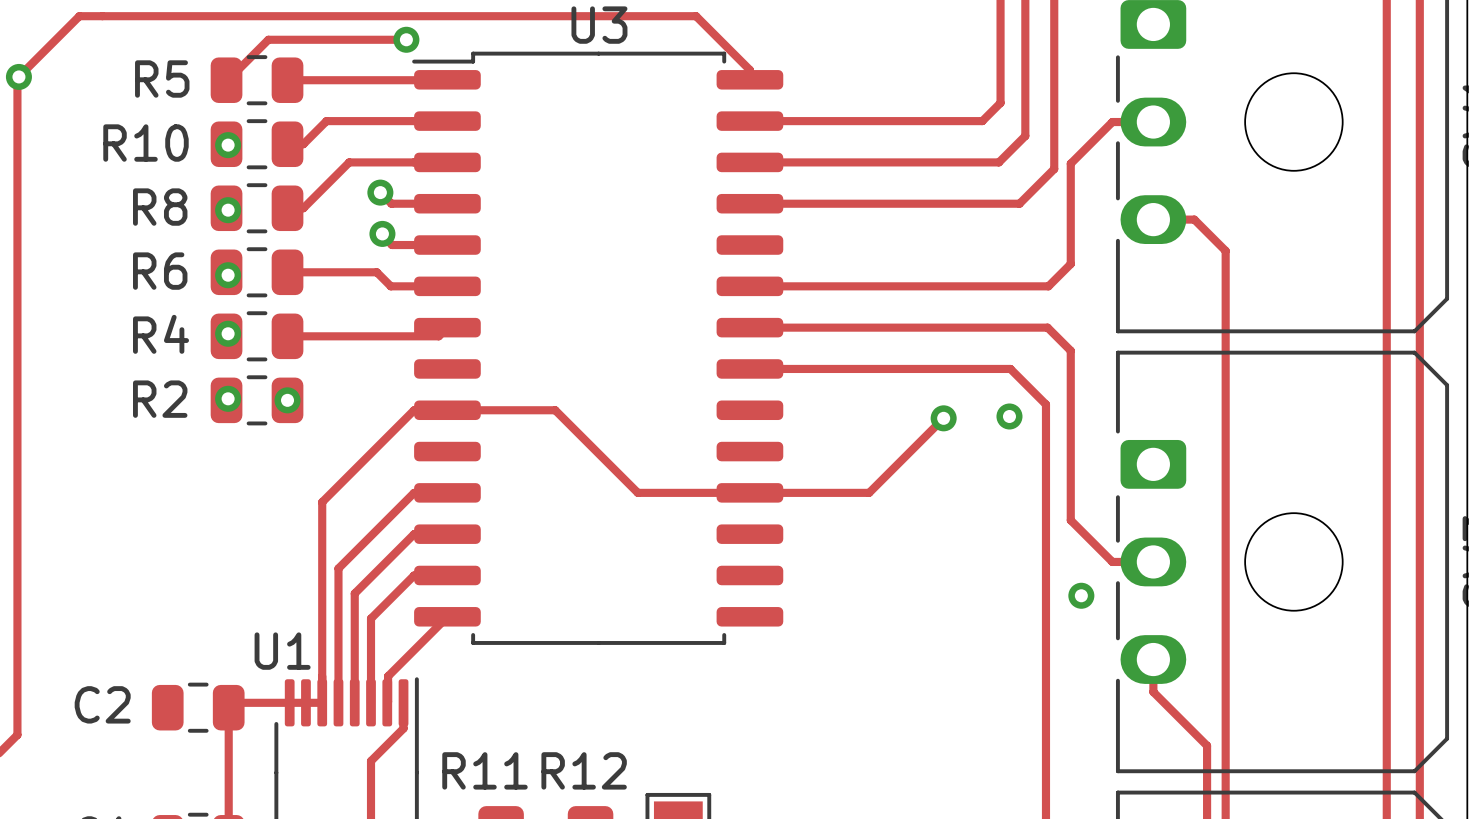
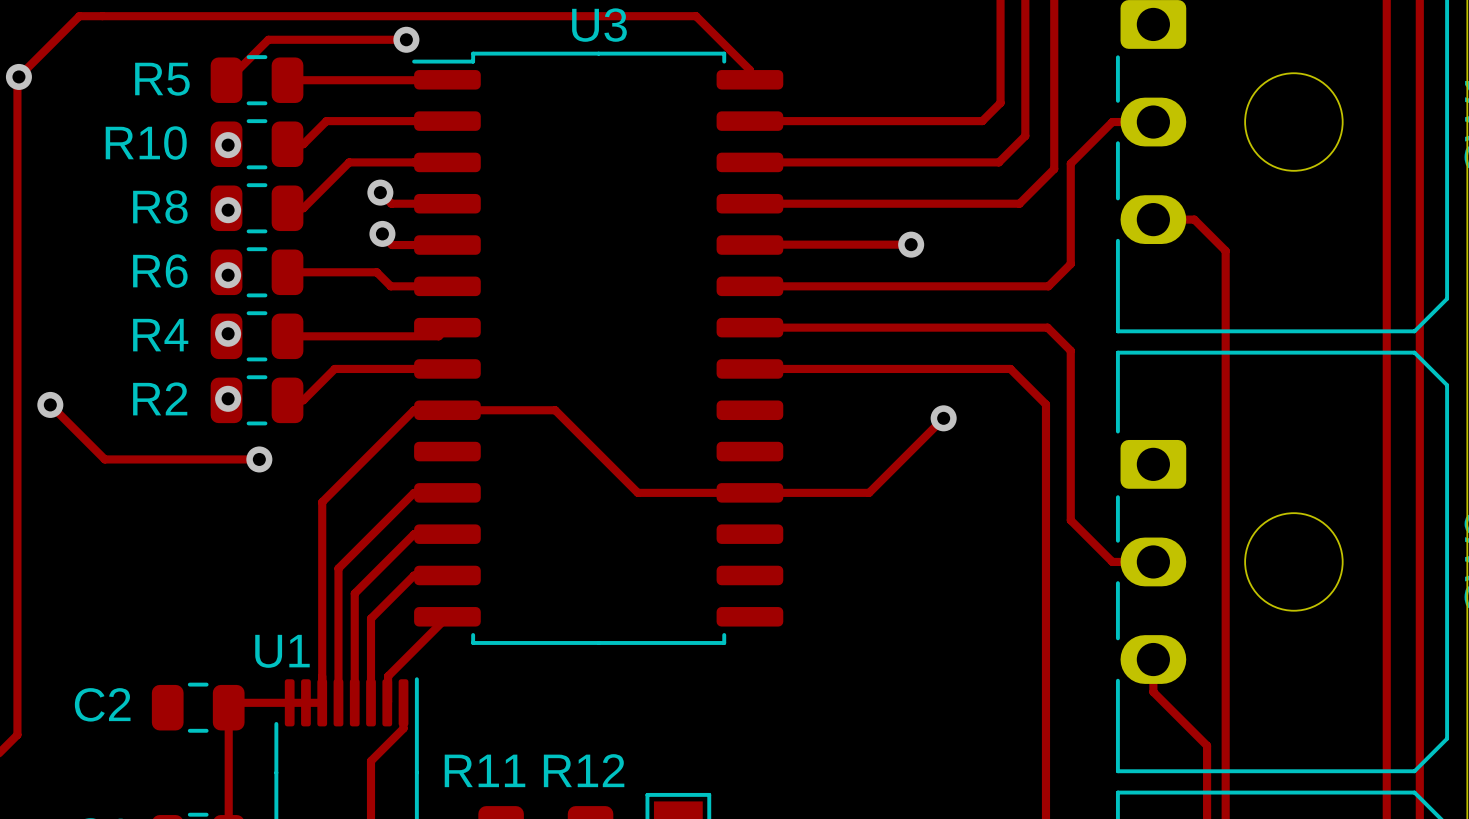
track: none -> (776, 244) (911, 244)
via: none -> (911, 244)
track: none -> (447, 368) (334, 368) (303, 400) (287, 400)
via position: (287, 400) -> (259, 459)
track: none -> (50, 404) (104, 459) (259, 459)
via: none -> (50, 404)
via: (1009, 416) -> none
via: (1081, 595) -> none

